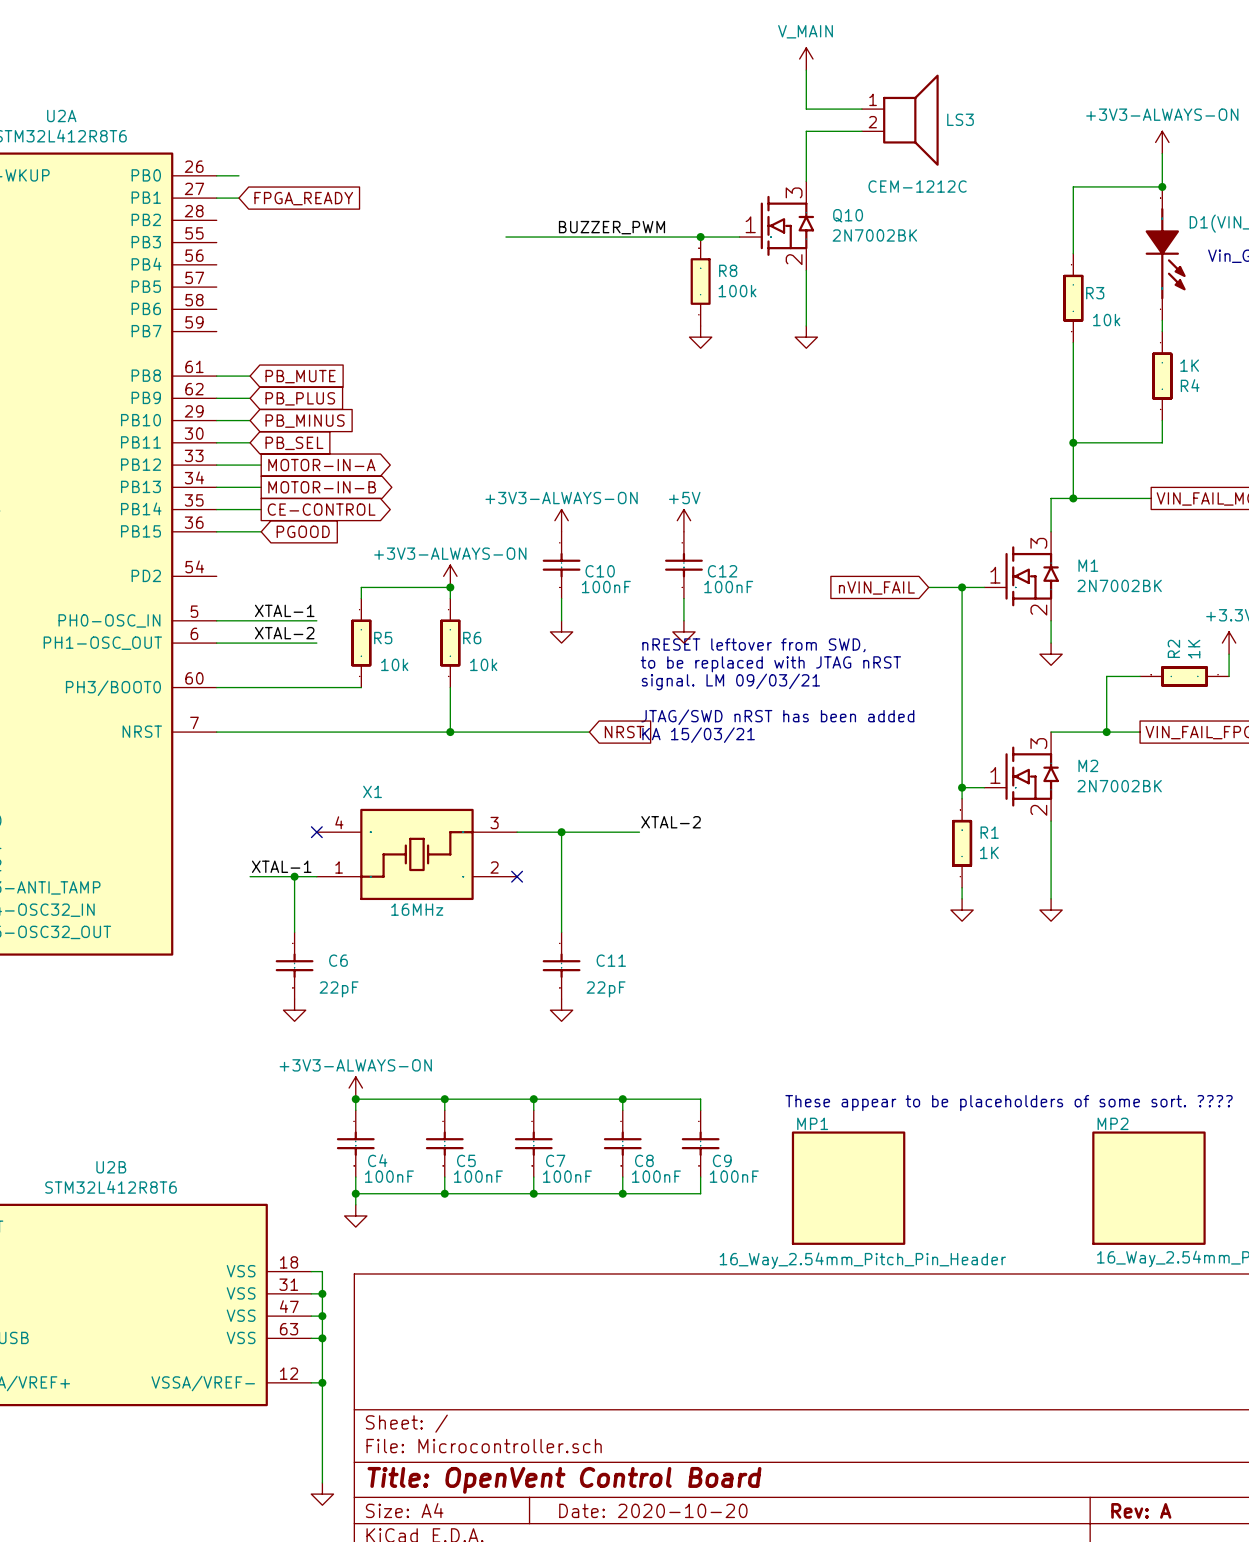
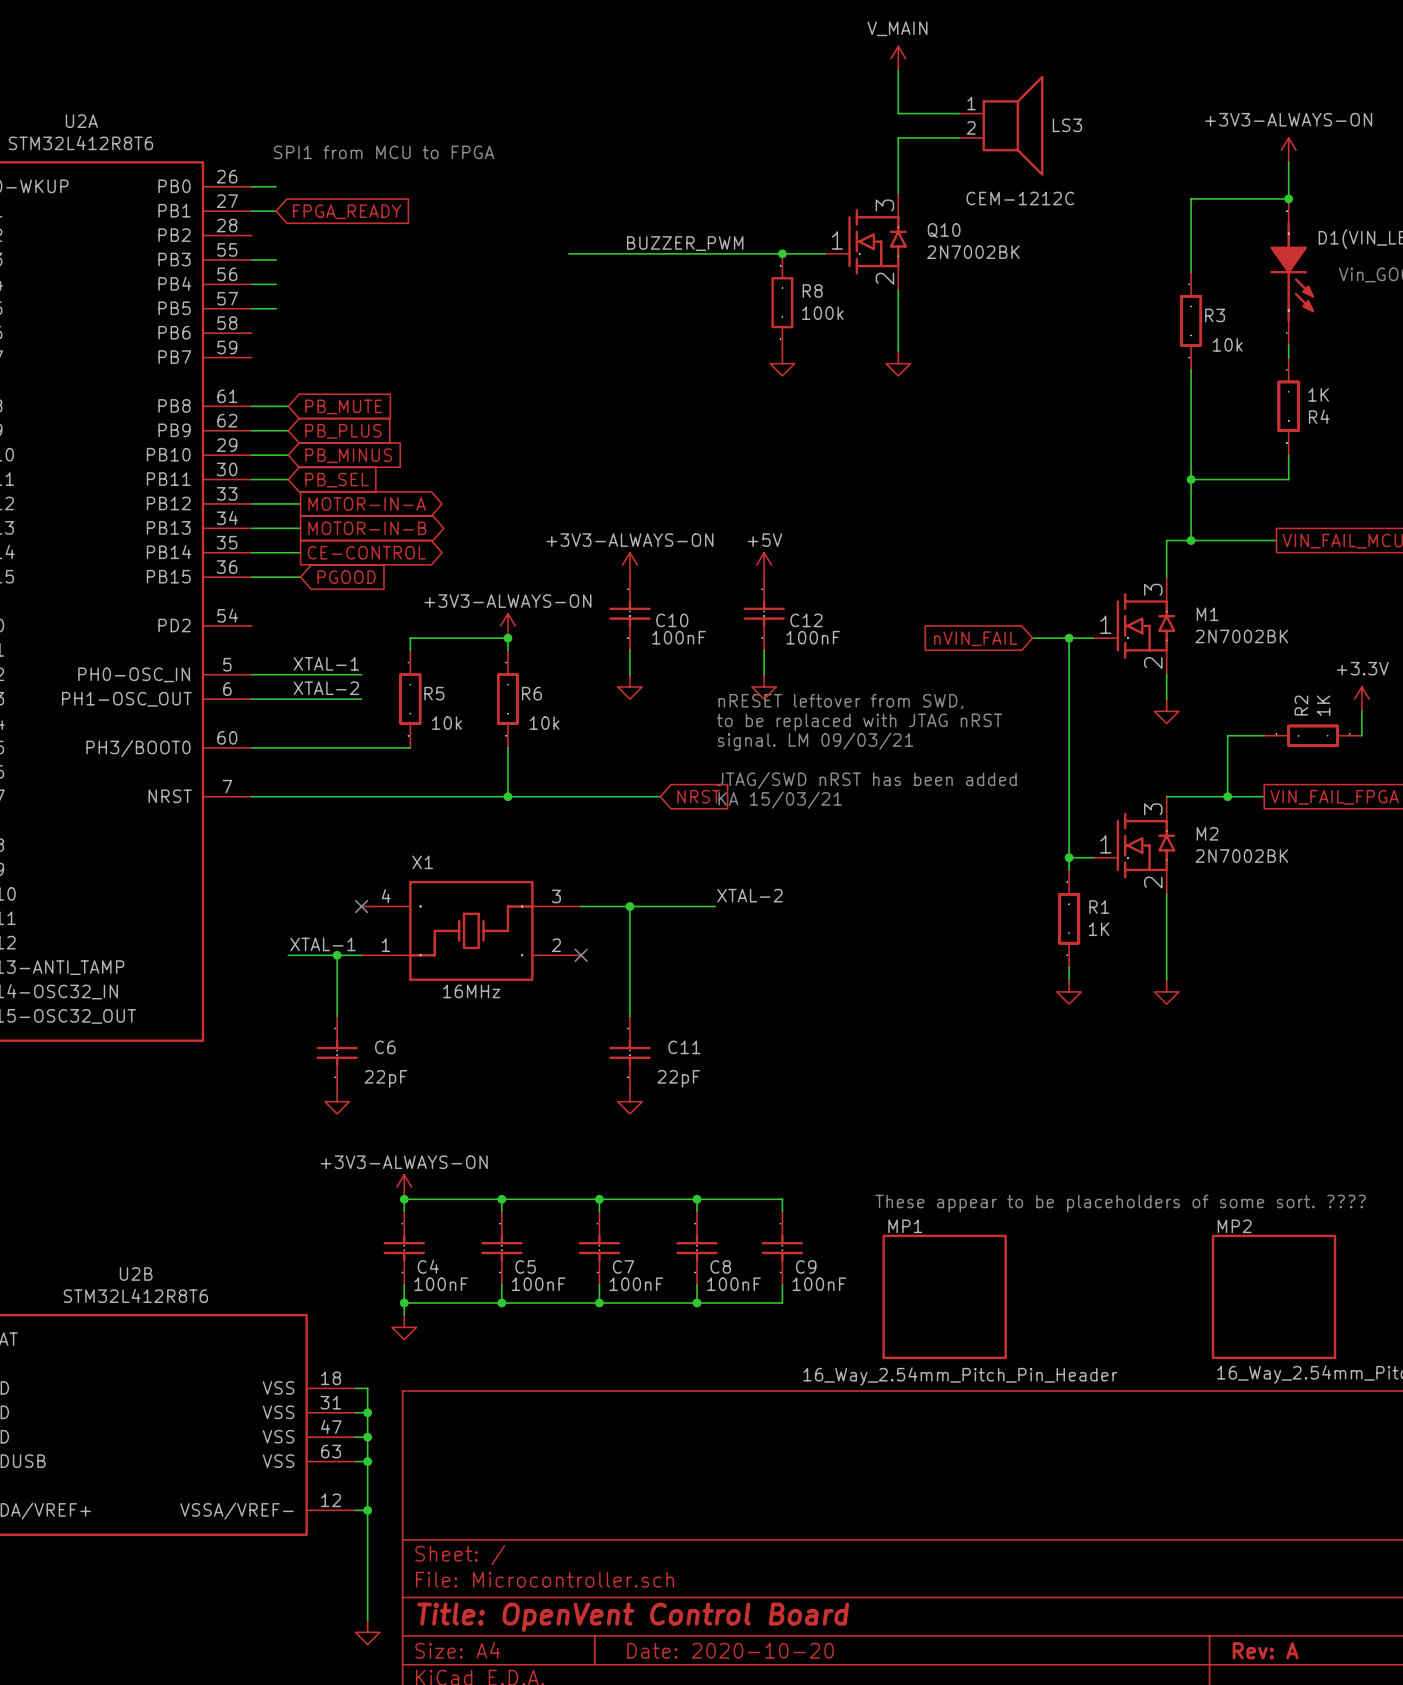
text: none -> SPI1 from MCU to FPGA (384, 152)
wire: none -> (251, 259) (276, 259)
wire: none -> (251, 284) (276, 284)
wire: none -> (251, 308) (276, 308)

